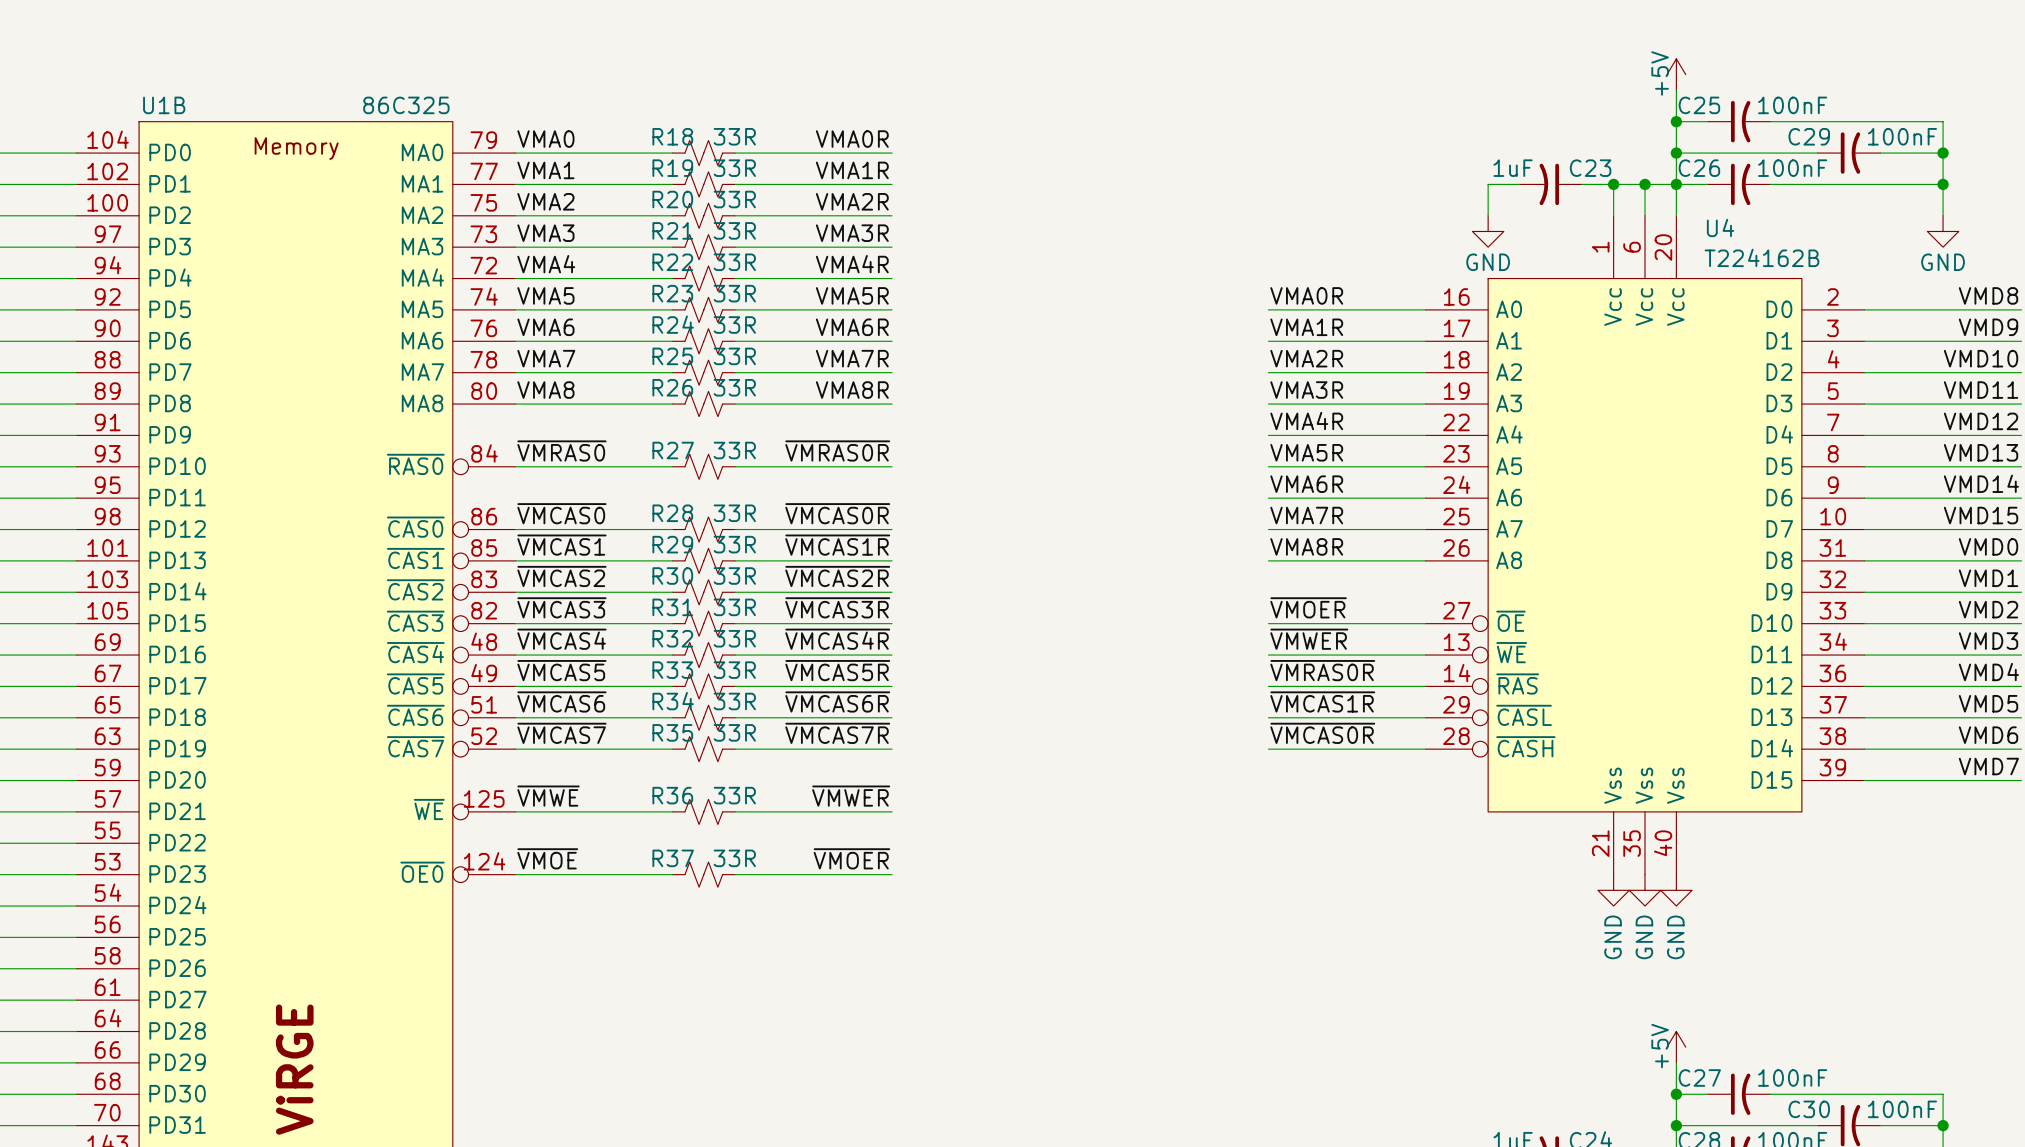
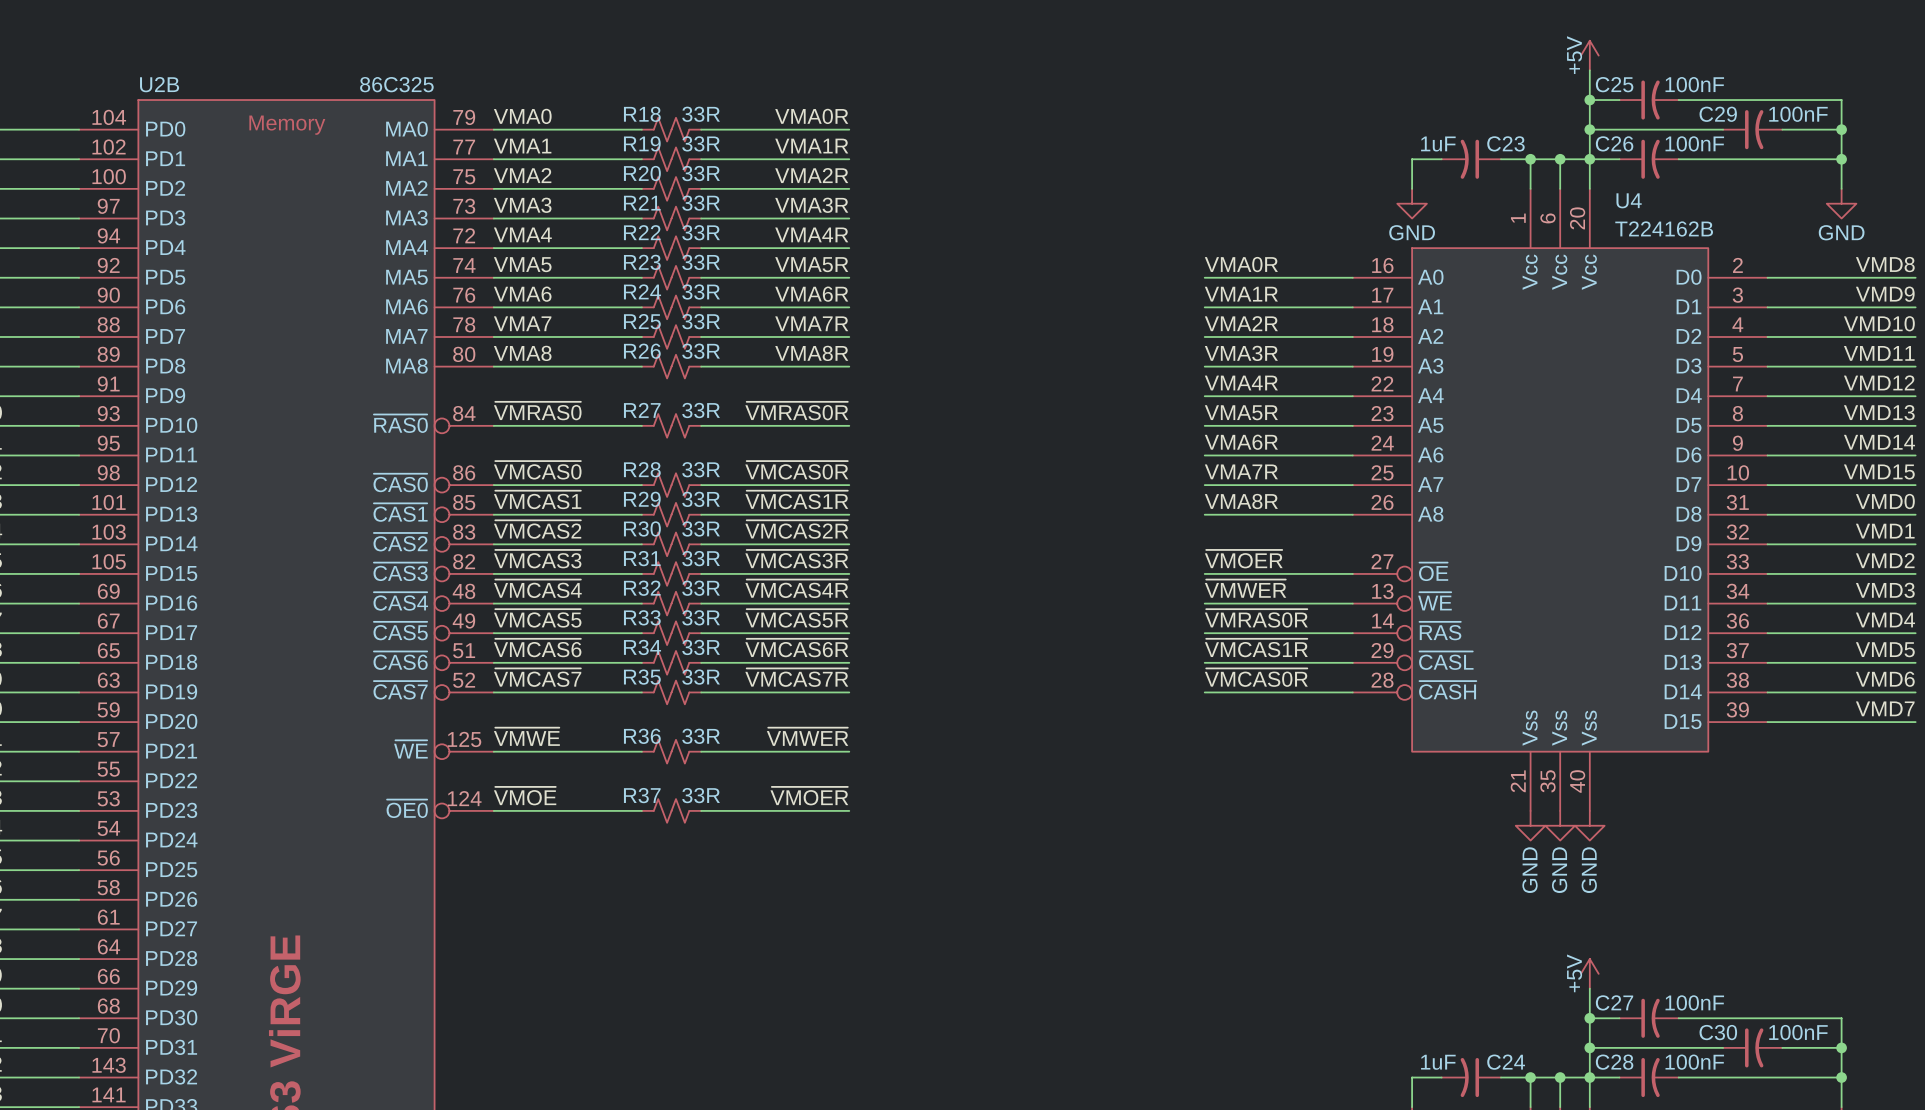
U1B name: U1B (164, 105) -> U2B (159, 84)

